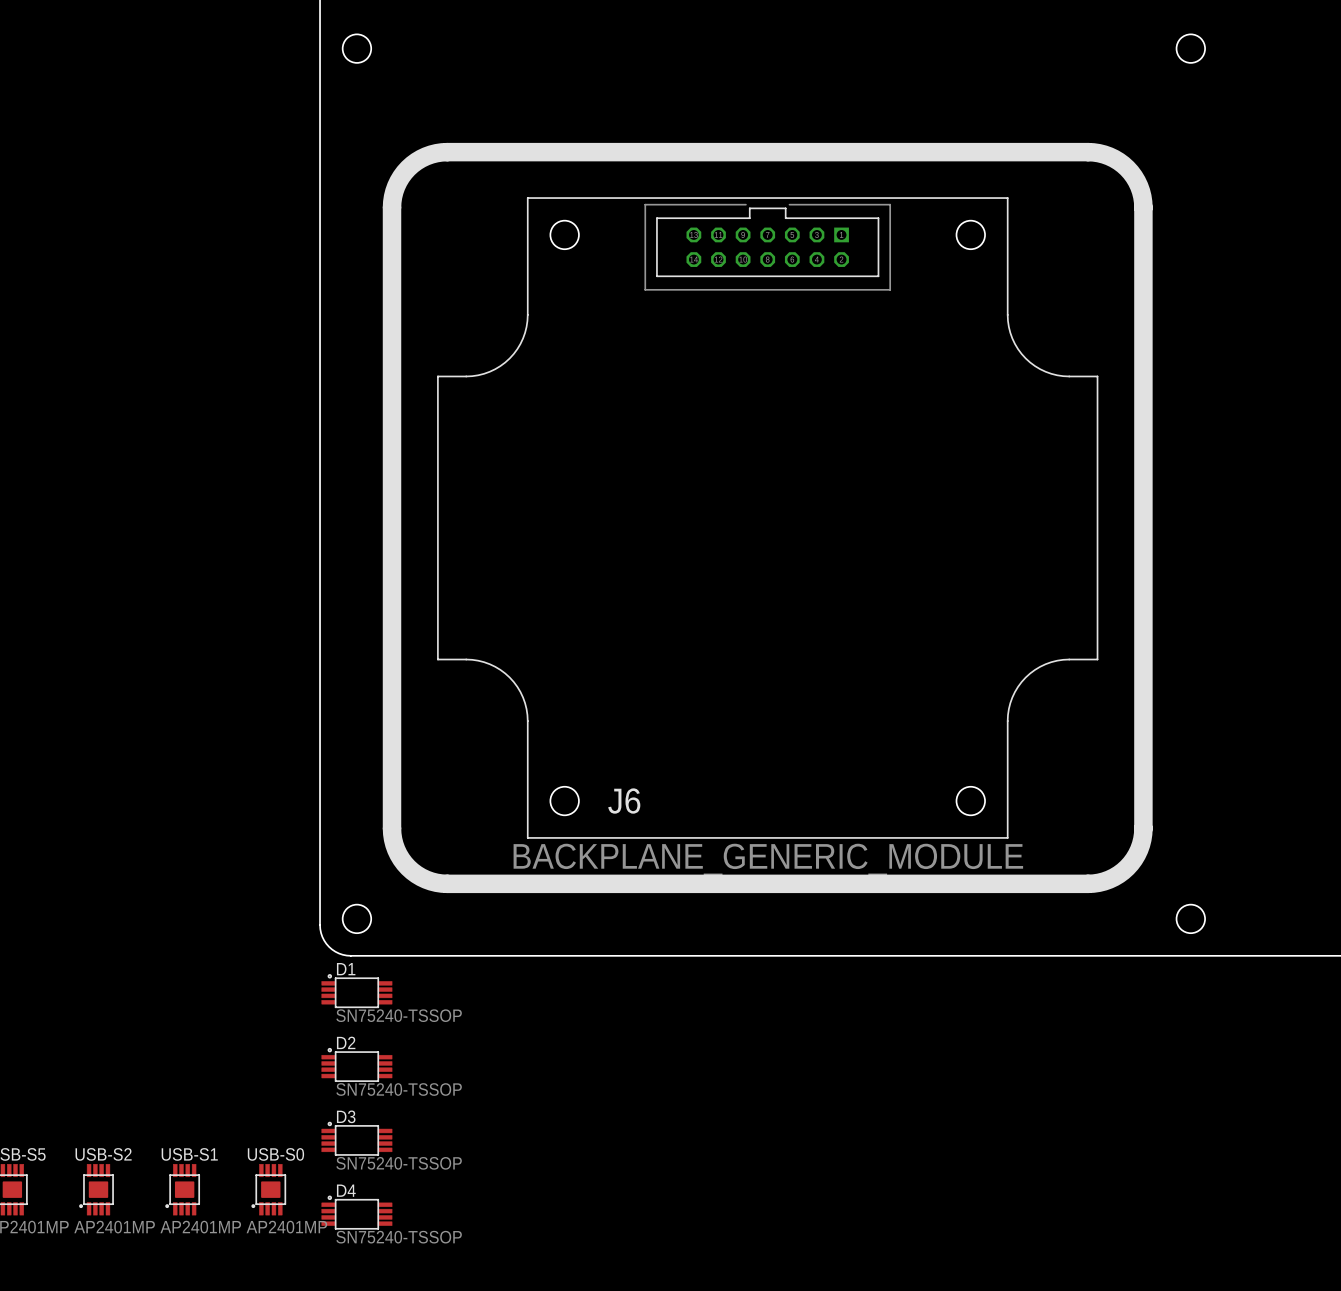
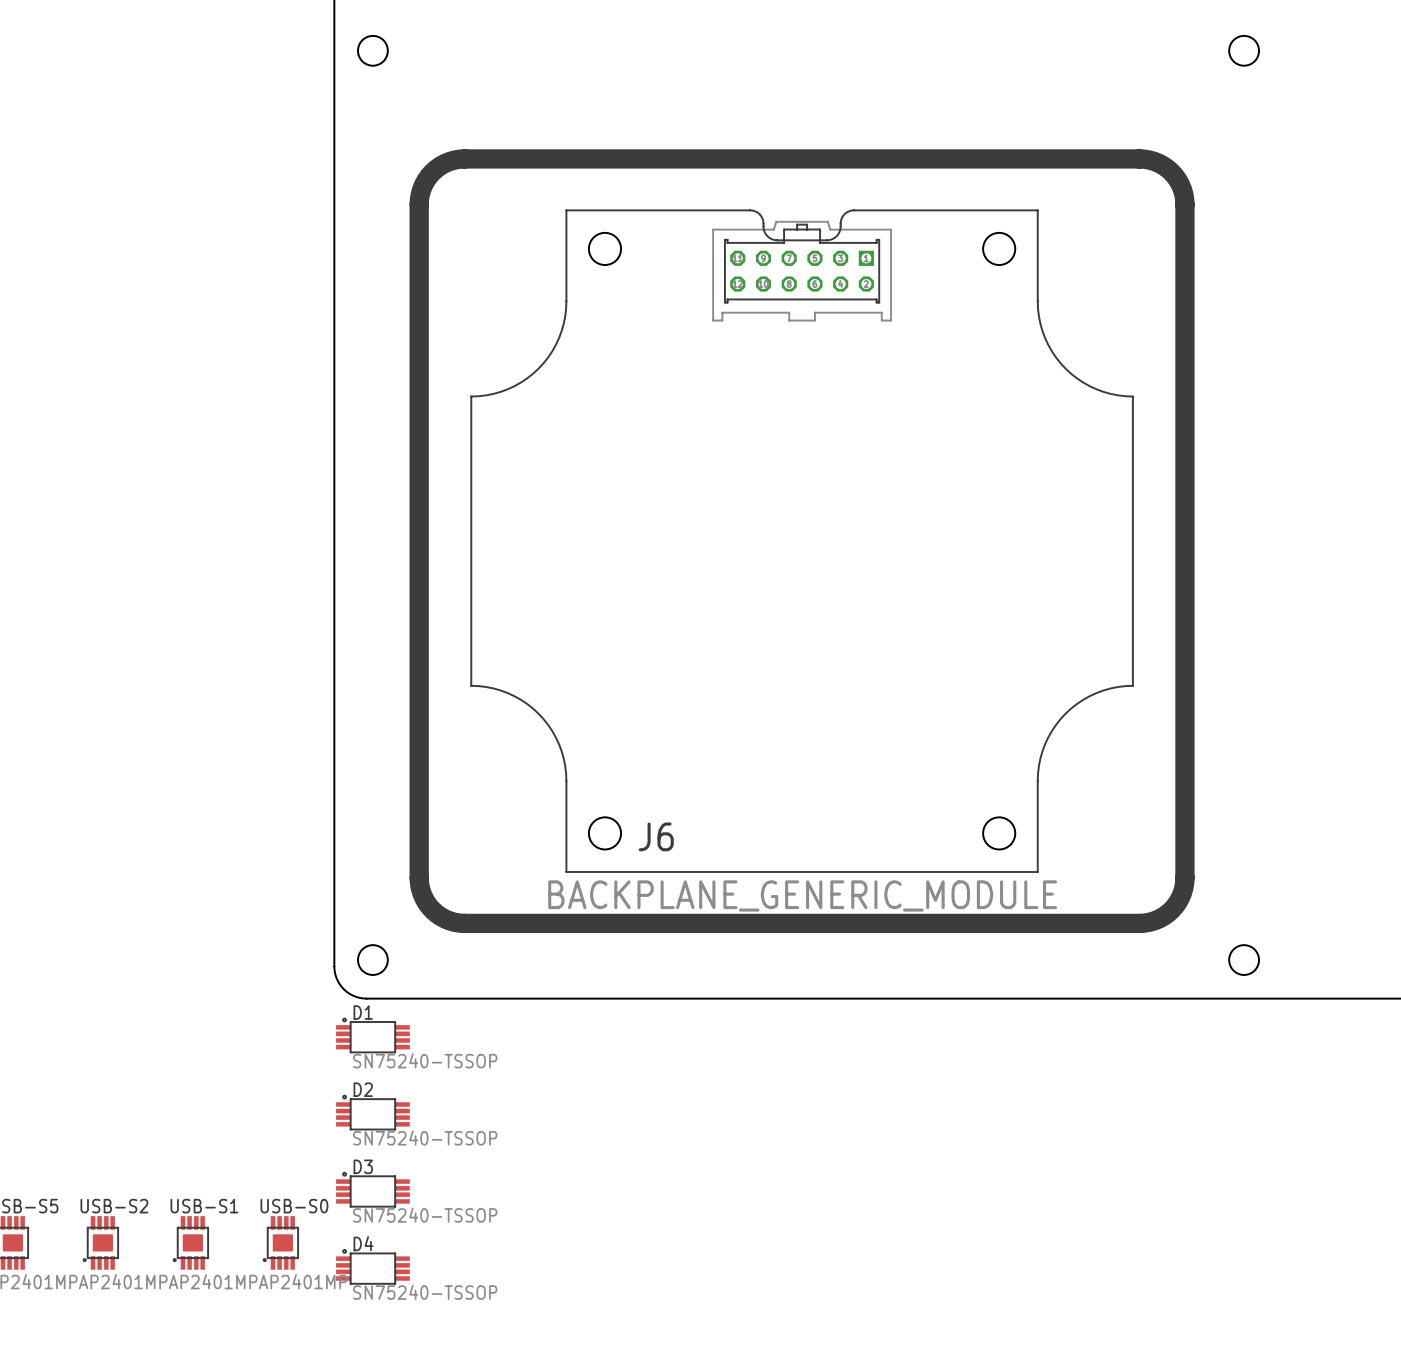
J6 footprint: [382, 142, 1153, 894] -> [409, 149, 1195, 934]

